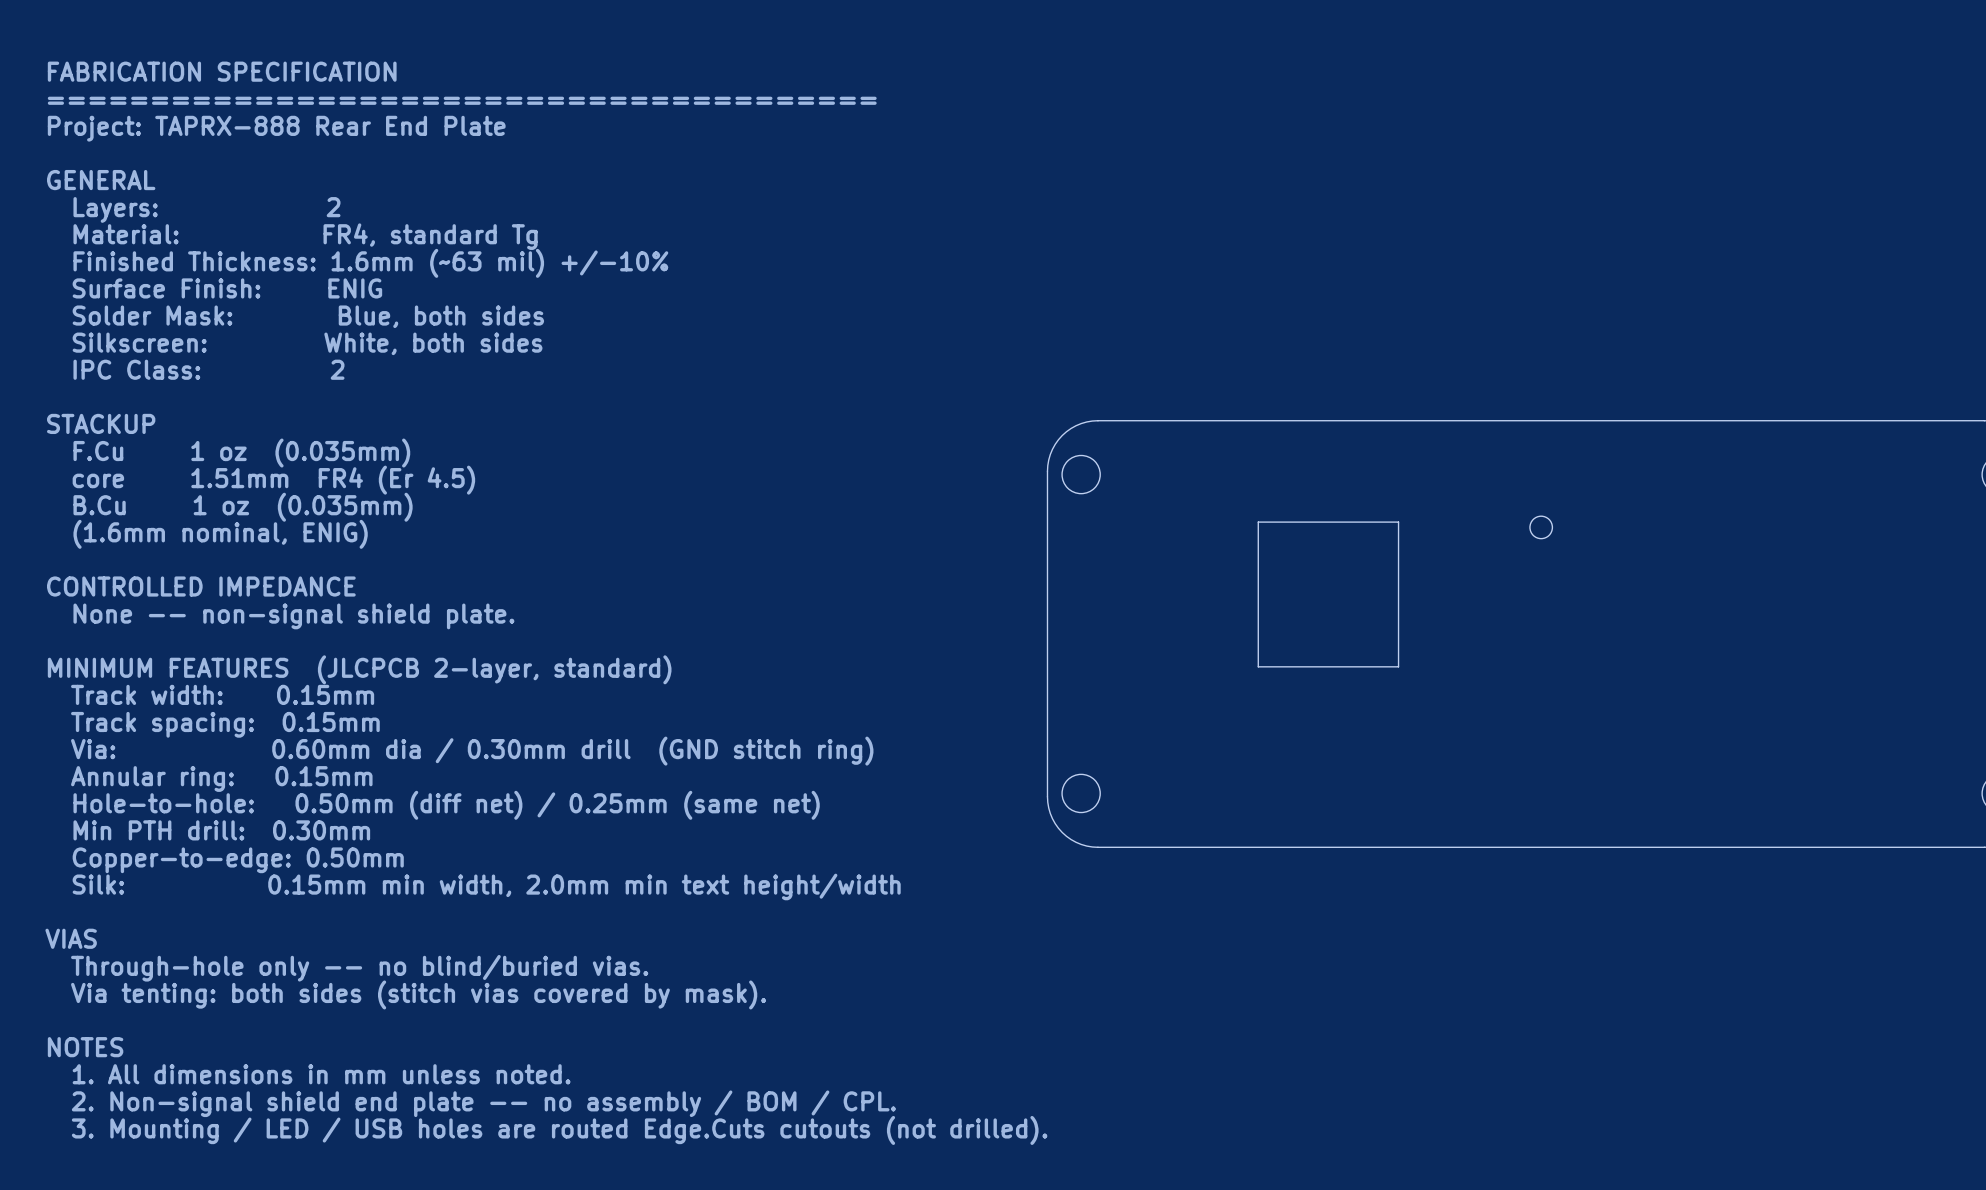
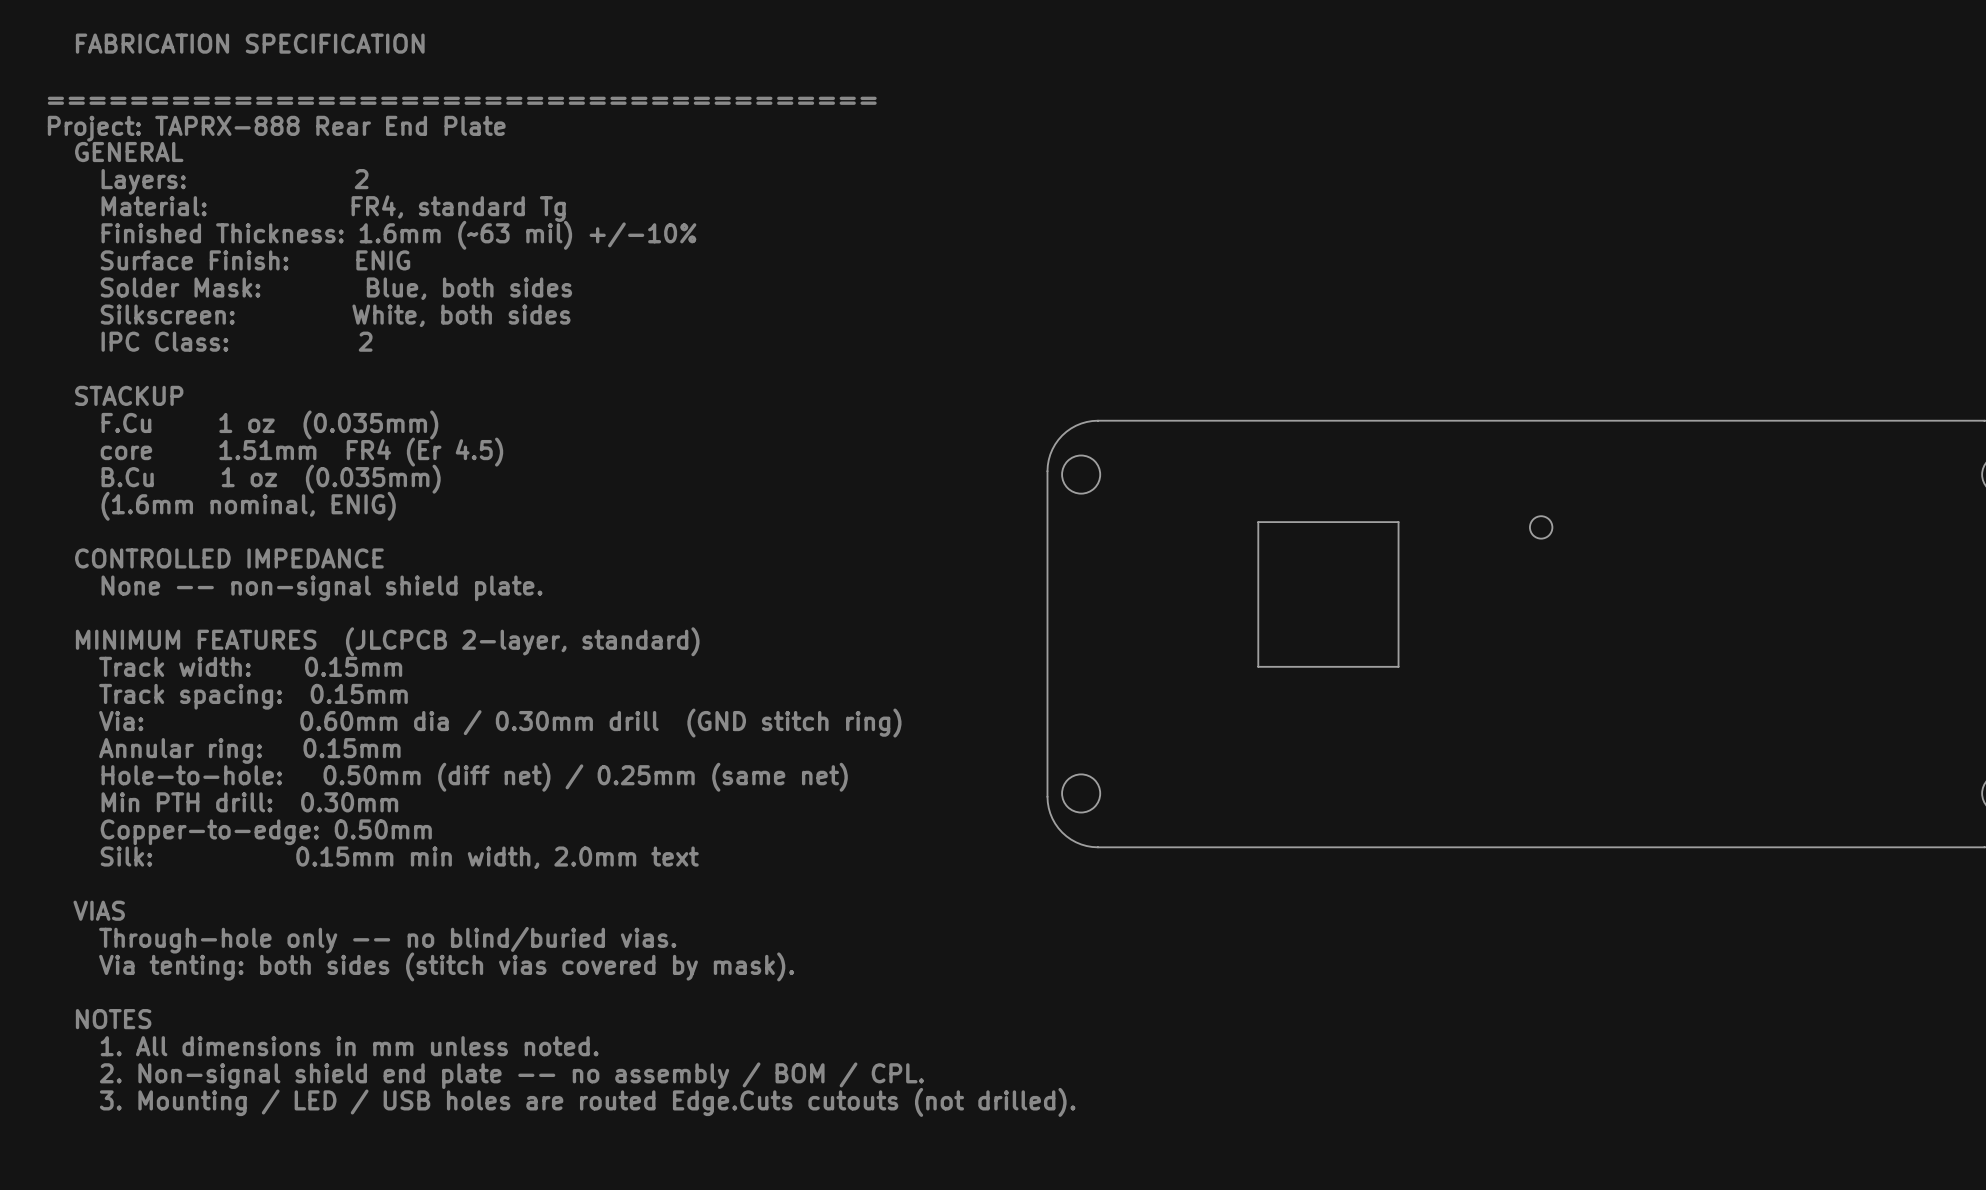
text position: FABRICATION SPECIFICATION (222, 71) -> FABRICATION SPECIFICATION (250, 43)
text position: GENERAL (101, 180) -> GENERAL (129, 152)
text position: Layers: 2 (206, 209) -> Layers: 2 (235, 181)
text position: Material: FR4, standard Tg (305, 236) -> Material: FR4, standard Tg (333, 208)
text position: Finished Thickness: 1.6mm (~63 mil) +/-10% (370, 263) -> Finished Thickness: 1.6mm (~63 mil) +/-10% (398, 235)
text position: Surface Finish: ENIG (227, 288) -> Surface Finish: ENIG (255, 260)
text position: Solder Mask: Blue, both sides (308, 316) -> Solder Mask: Blue, both sides (336, 288)
text position: Silkscreen: White, both sides (307, 343) -> Silkscreen: White, both sides (335, 315)
text position: IPC Class: 2 (208, 369) -> IPC Class: 2 (237, 341)
text position: STACKUP (101, 423) -> STACKUP (129, 395)
text position: F.Cu 1 oz (0.035mm) (241, 453) -> F.Cu 1 oz (0.035mm) (269, 424)
text position: core 1.51mm FR4 (Er 4.5) (273, 480) -> core 1.51mm FR4 (Er 4.5) (301, 452)
text position: B.Cu 1 oz (0.035mm) (243, 507) -> B.Cu 1 oz (0.035mm) (271, 479)
text position: (1.6mm nominal, ENIG) (220, 534) -> (1.6mm nominal, ENIG) (248, 506)
text position: CONTROLLED IMPEDANCE (201, 586) -> CONTROLLED IMPEDANCE (229, 558)
text position: None -- non-signal shield plate. (293, 616) -> None -- non-signal shield plate. (321, 588)
text position: MINIMUM FEATURES (JLCPCB 2-layer, standard) (359, 669) -> MINIMUM FEATURES (JLCPCB 2-layer, standard) (387, 641)
text position: Track width: 0.15mm (222, 694) -> Track width: 0.15mm (250, 666)
text position: Track spacing: 0.15mm (225, 724) -> Track spacing: 0.15mm (253, 696)
text position: Via: 0.60mm dia / 0.30mm drill (GND stitch ring) (472, 751) -> Via: 0.60mm dia / 0.30mm drill (GND stitch ring) (500, 723)
text position: Annular ring: 0.15mm (221, 778) -> Annular ring: 0.15mm (249, 750)
text position: Hole-to-hole: 0.50mm (diff net) / 0.25mm (same net) (446, 805) -> Hole-to-hole: 0.50mm (diff net) / 0.25mm (same net) (474, 777)
text position: Min PTH drill: 0.30mm (221, 830) -> Min PTH drill: 0.30mm (249, 802)
text position: Copper-to-edge: 0.50mm (238, 860) -> Copper-to-edge: 0.50mm (266, 832)
text: Silk: 0.15mm min width, 2.0mm min text height/width (486, 886) -> Silk: 0.15mm min width, 2.0mm text (399, 857)
text position: VIAS (71, 938) -> VIAS (99, 910)
text position: Through-hole only -- no blind/buried vias. (359, 968) -> Through-hole only -- no blind/buried vias. (387, 940)
text position: Via tenting: both sides (stitch vias covered by mask). (418, 994) -> Via tenting: both sides (stitch vias covered by mask). (446, 966)
text position: NOTES (85, 1047) -> NOTES (113, 1019)
text position: 1. All dimensions in mm unless noted. (321, 1074) -> 1. All dimensions in mm unless noted. (349, 1046)
text position: 2. Non-signal shield end plate -- no assembly / BOM / CPL. (483, 1103) -> 2. Non-signal shield end plate -- no assembly / BOM / CPL. (511, 1075)
text position: 3. Mounting / LED / USB holes are routed Edge.Cuts cutouts (not drilled). (559, 1130) -> 3. Mounting / LED / USB holes are routed Edge.Cuts cutouts (not drilled). (587, 1102)

